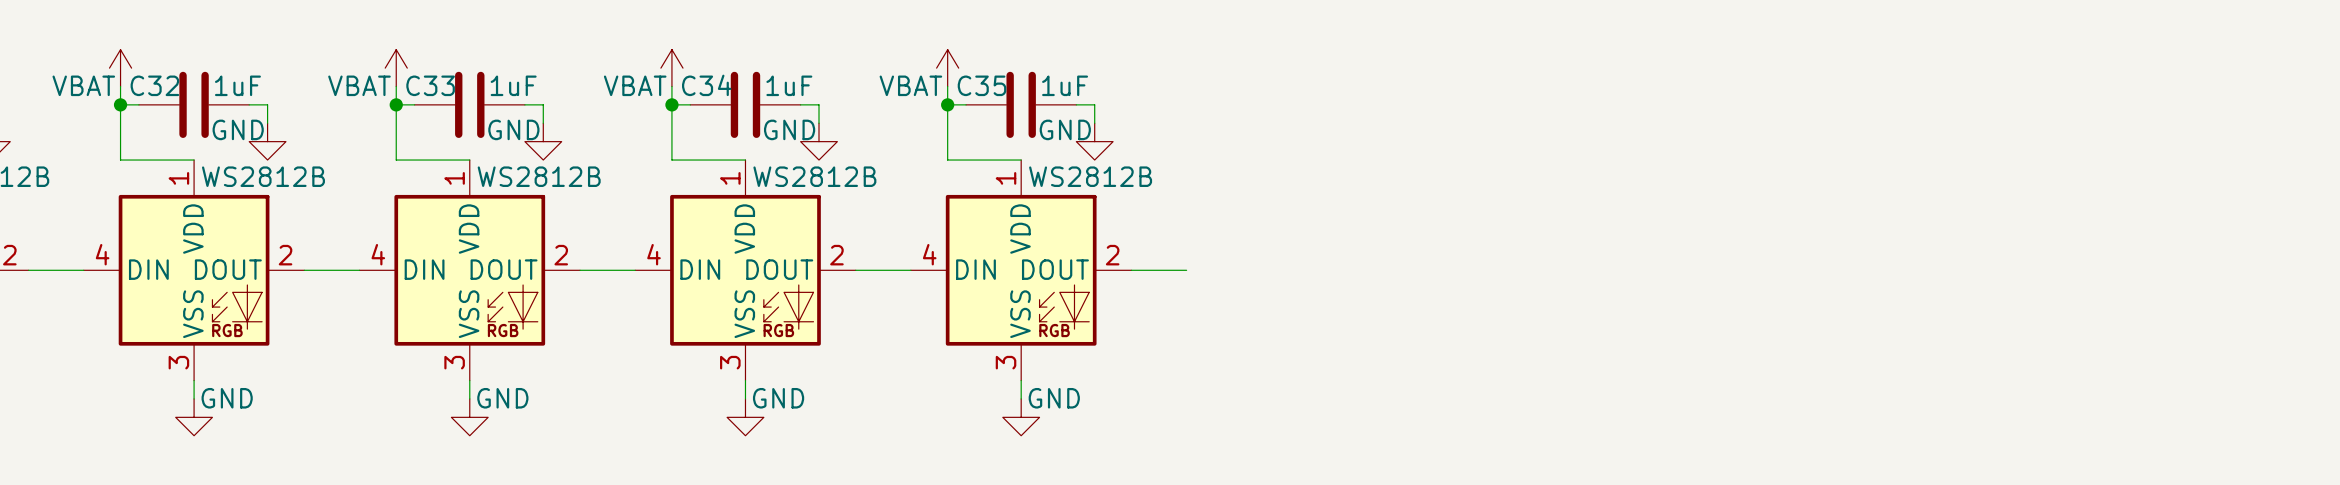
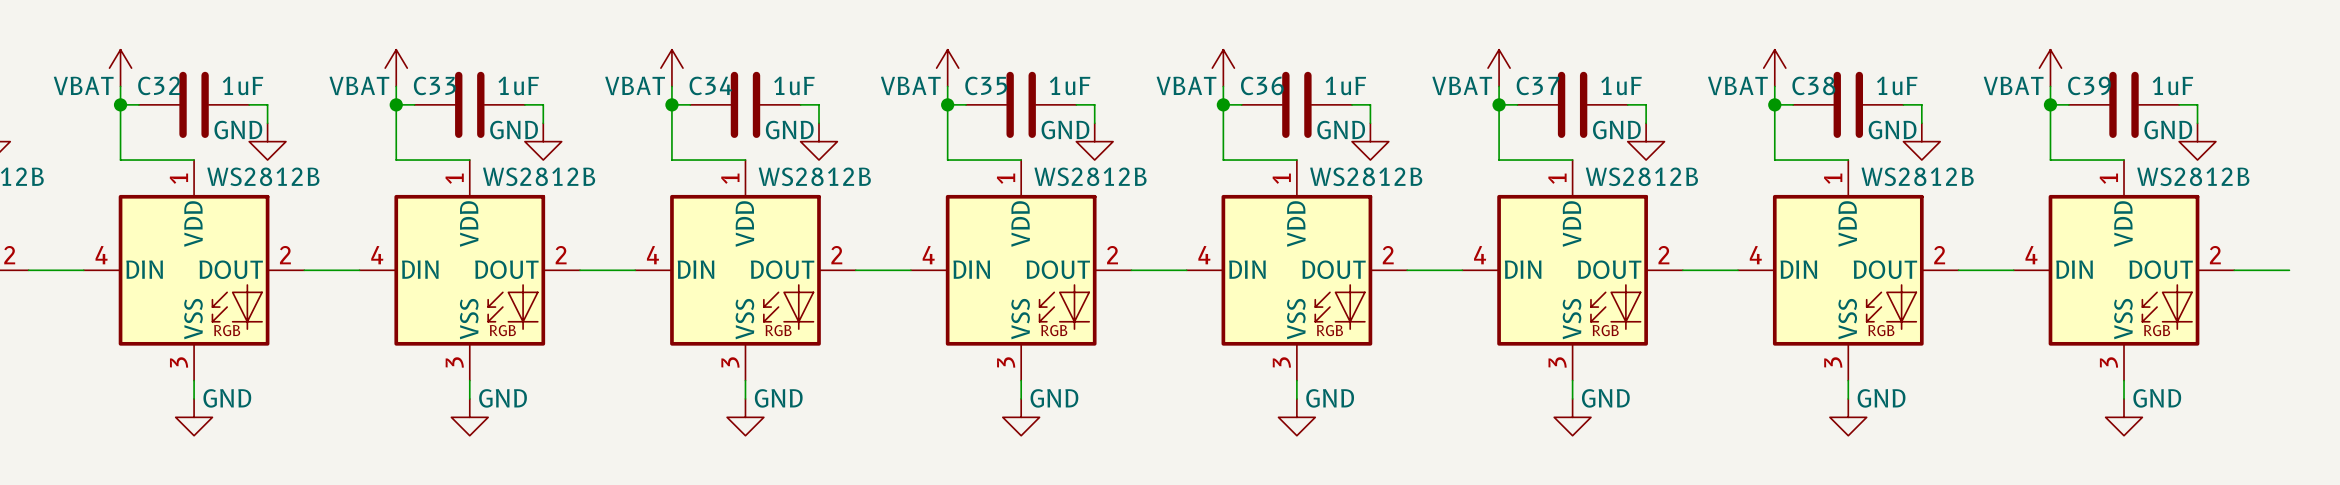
power symbol: none -> VBAT (1223, 68)
power symbol: none -> VBAT (1499, 68)
power symbol: none -> VBAT (1774, 68)
power symbol: none -> VBAT (2050, 68)
wire: none -> (1223, 86) (1223, 160) (1296, 160)
wire: none -> (1499, 86) (1499, 160) (1572, 160)
wire: none -> (1774, 86) (1774, 160) (1848, 160)
wire: none -> (2050, 86) (2050, 160) (2124, 160)
wire: none -> (1223, 104) (1241, 104)
junction: none -> (1223, 104)
C36: none -> 1uF (1296, 104)
wire: none -> (1352, 104) (1370, 104) (1370, 123)
wire: none -> (1499, 104) (1517, 104)
junction: none -> (1499, 104)
C37: none -> 1uF (1572, 104)
wire: none -> (1627, 104) (1646, 104) (1646, 123)
wire: none -> (1774, 104) (1793, 104)
junction: none -> (1774, 104)
C38: none -> 1uF (1848, 104)
wire: none -> (1903, 104) (1921, 104) (1921, 123)
wire: none -> (2050, 104) (2068, 104)
junction: none -> (2050, 104)
C39: none -> 1uF (2124, 104)
wire: none -> (2179, 104) (2197, 104) (2197, 123)
power symbol: none -> GND (1370, 141)
power symbol: none -> GND (1646, 141)
power symbol: none -> GND (1921, 141)
power symbol: none -> GND (2197, 141)
part: none -> WS2812B (1296, 270)
wire: none -> (1407, 270) (1462, 270)
part: none -> WS2812B (1572, 270)
wire: none -> (1682, 270) (1738, 270)
part: none -> WS2812B (1848, 270)
wire: none -> (1958, 270) (2013, 270)
part: none -> WS2812B (2124, 270)
wire: none -> (2234, 270) (2289, 270)
wire: none -> (1296, 380) (1296, 398)
wire: none -> (1572, 380) (1572, 398)
wire: none -> (1848, 380) (1848, 398)
wire: none -> (2124, 380) (2124, 398)
power symbol: none -> GND (1296, 417)
power symbol: none -> GND (1572, 417)
power symbol: none -> GND (1848, 417)
power symbol: none -> GND (2124, 417)

